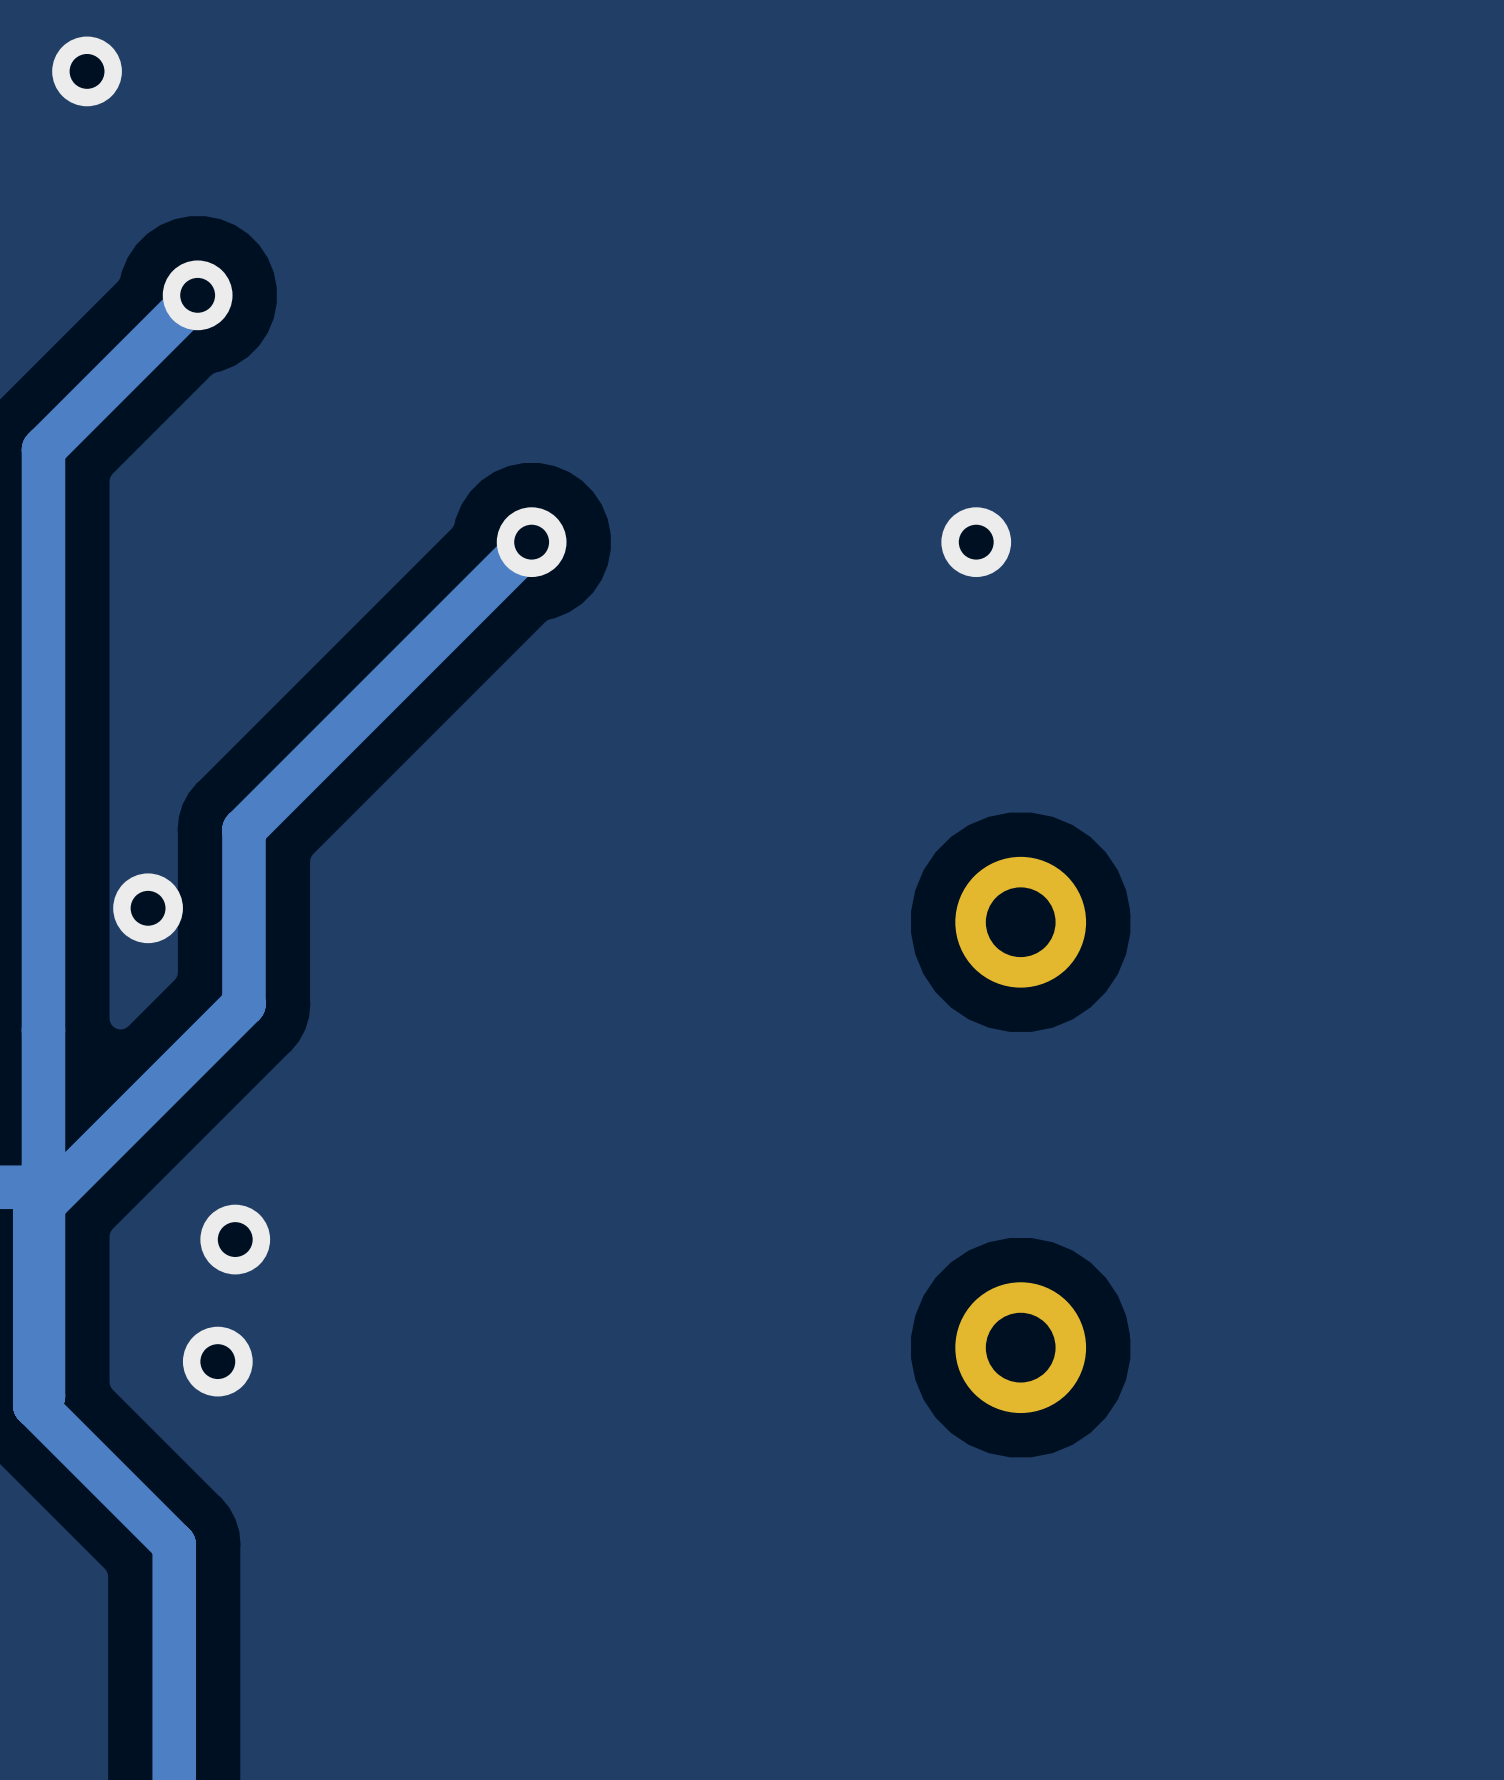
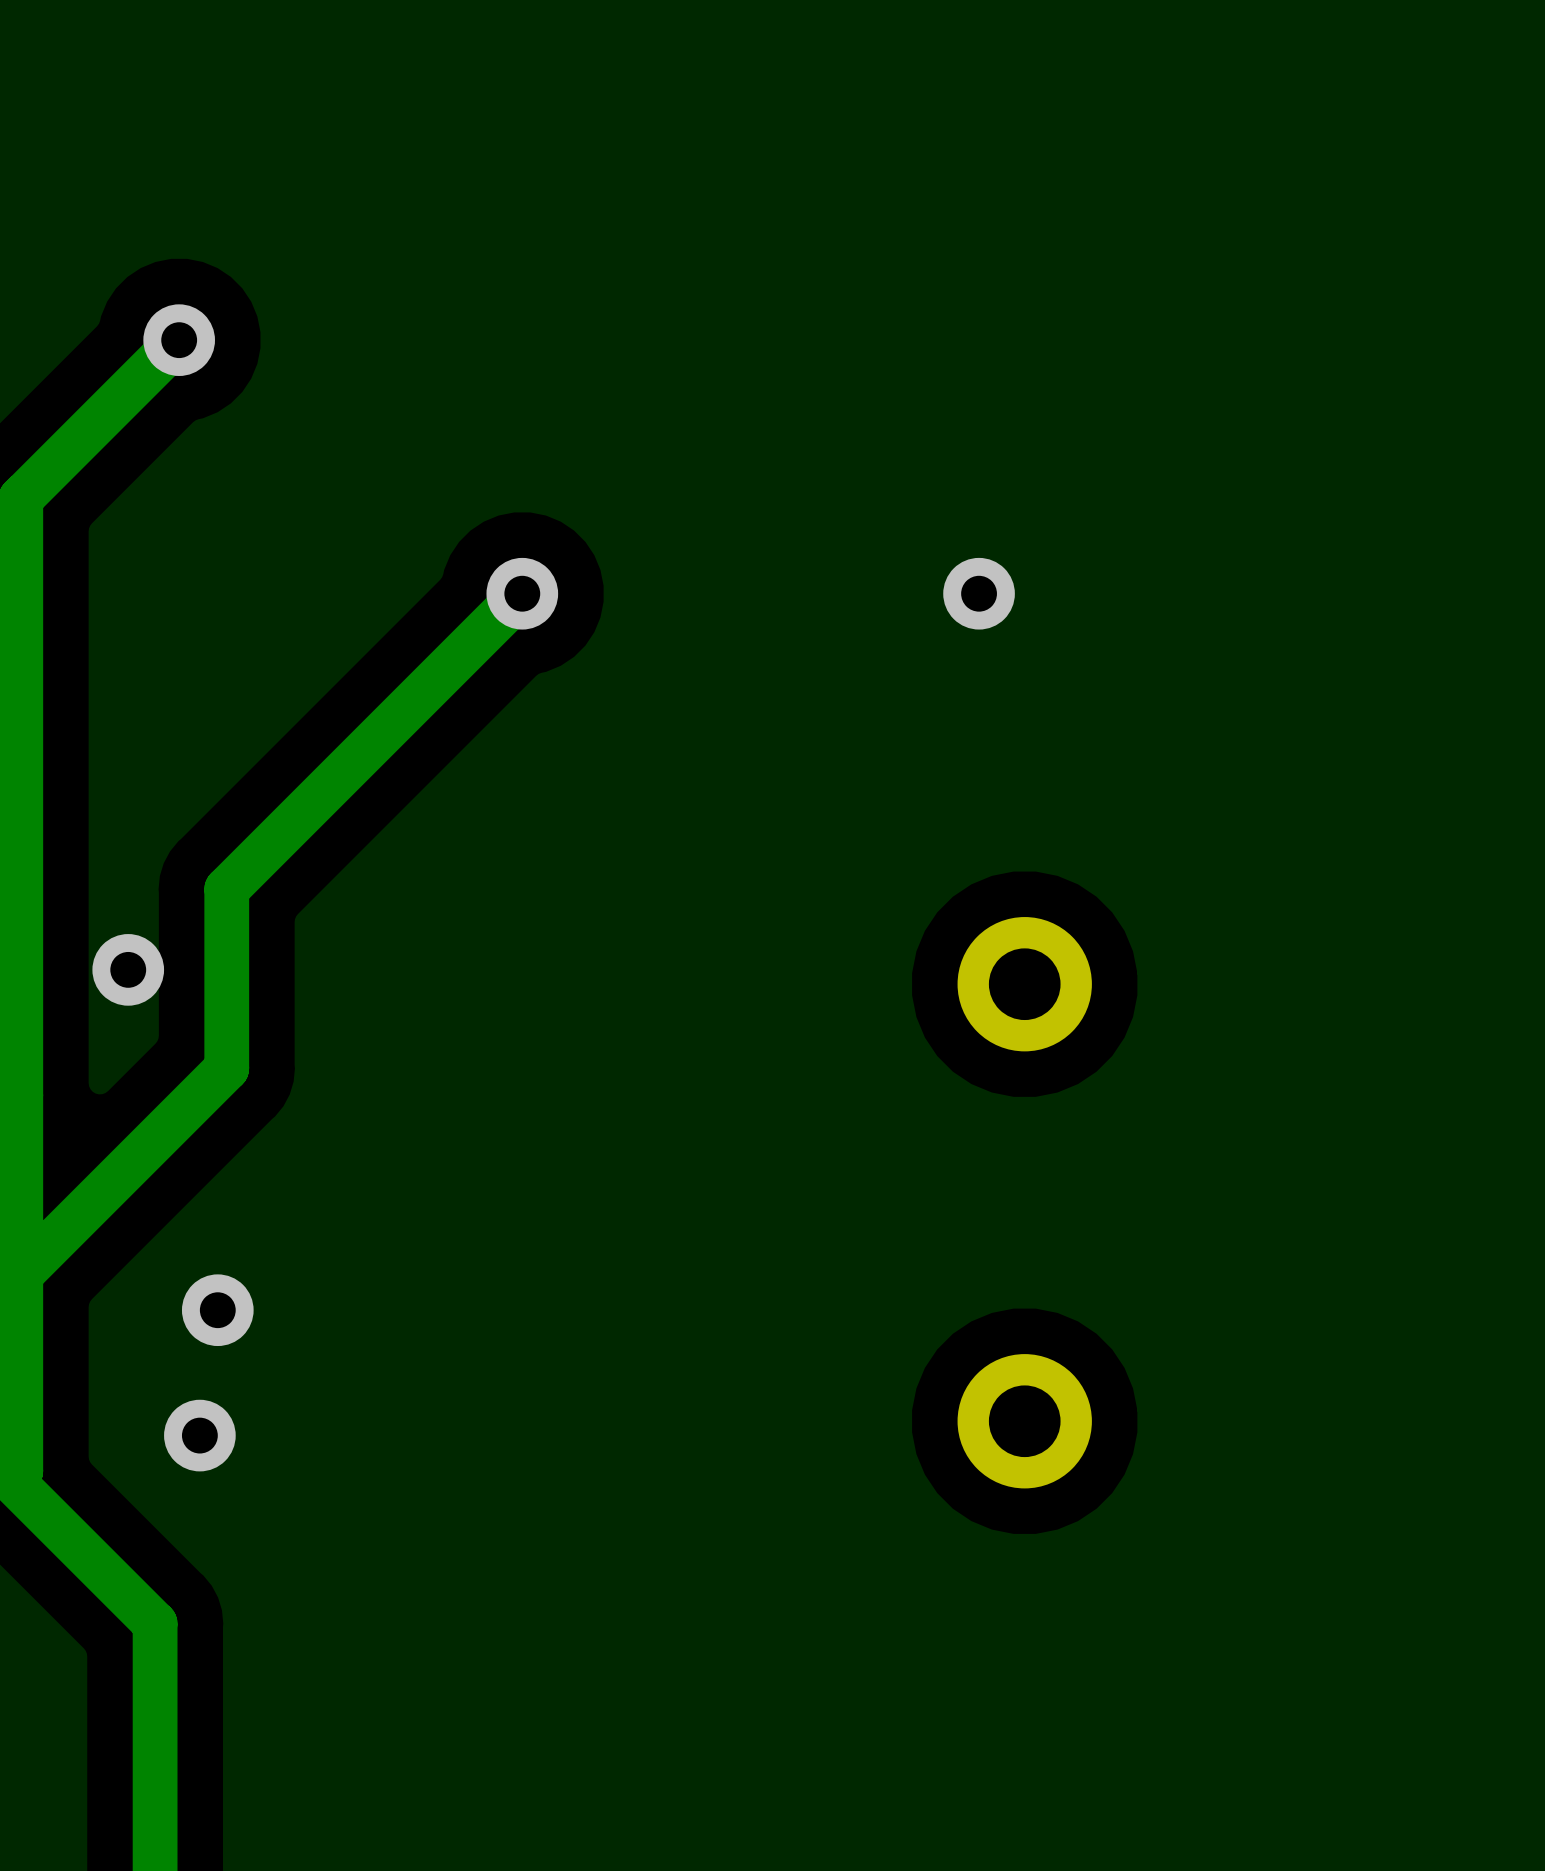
via: (87, 71) -> none

